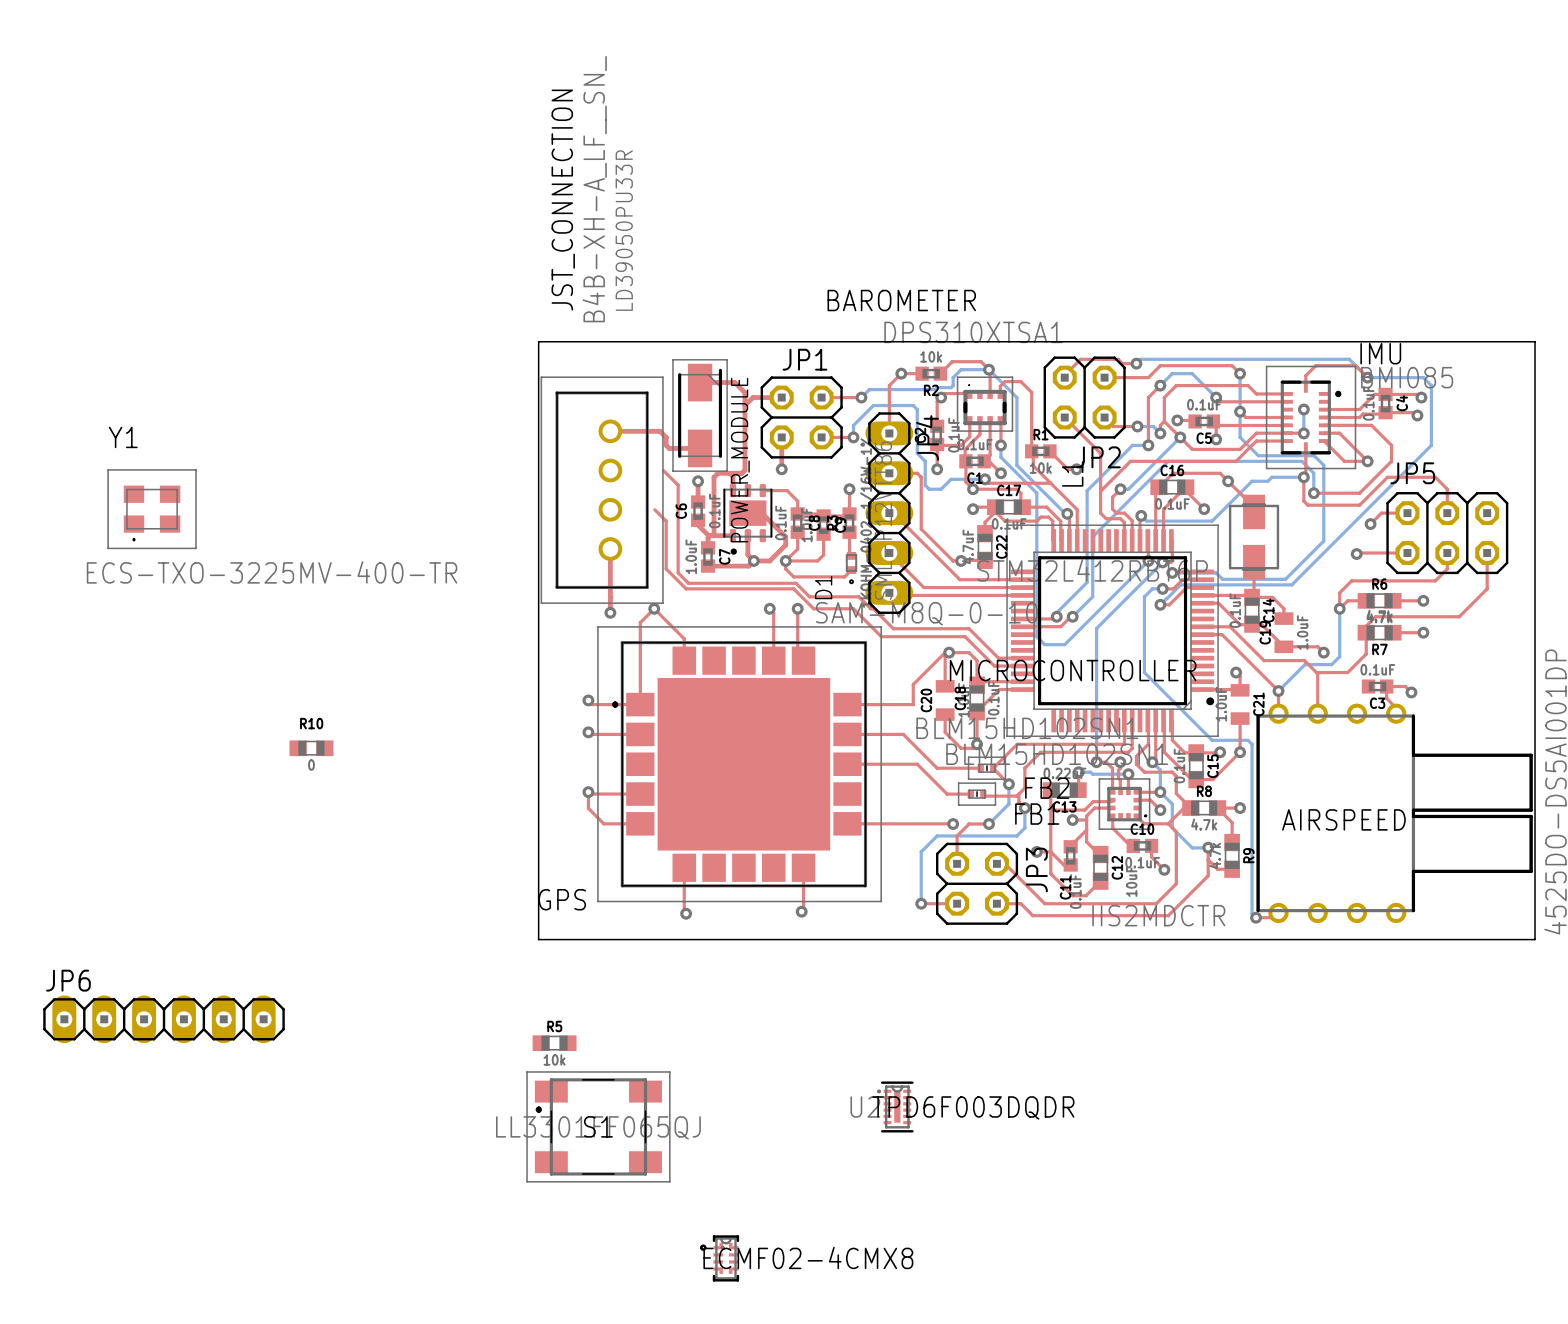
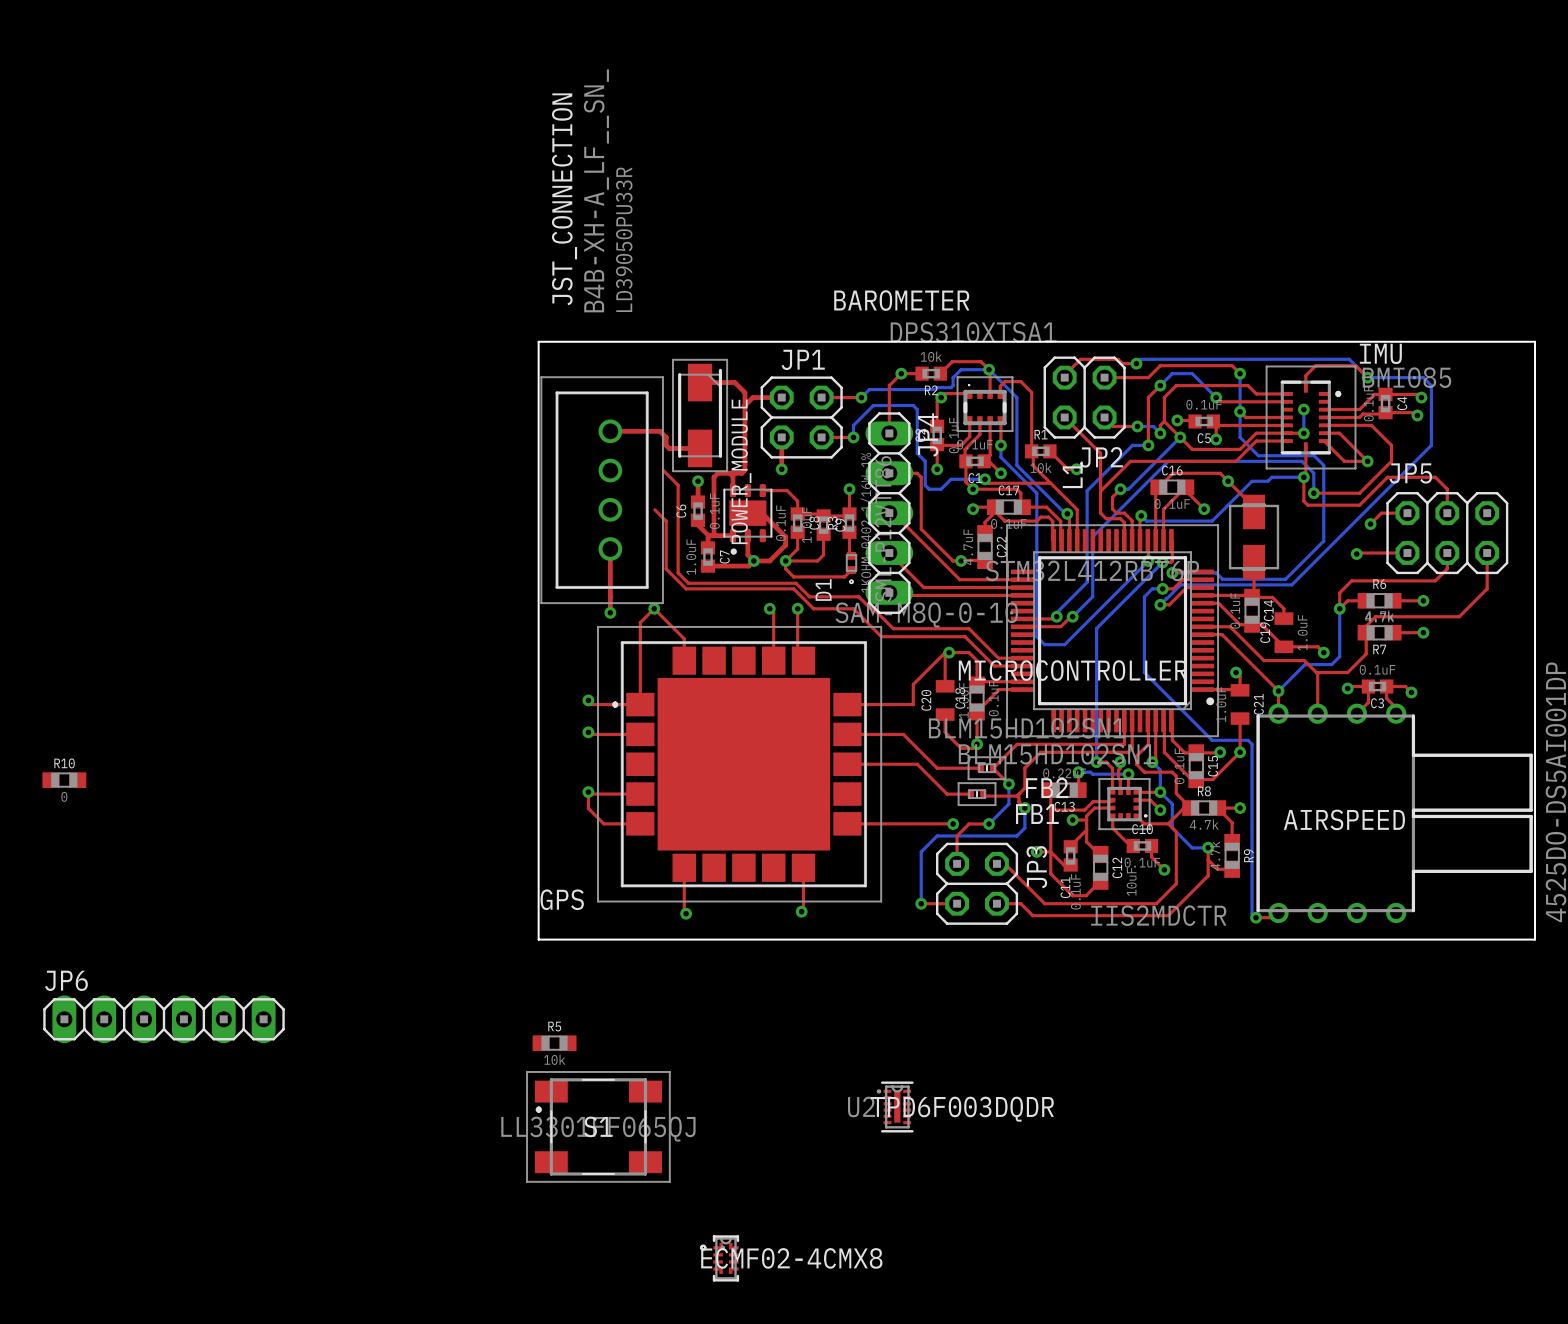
Y1: ECS-TXO-3225MV-400-TR (152, 509) -> none
top track: none -> (1347, 688) (1349, 686) (1368, 686) (1368, 702) (1357, 713)
via: none -> (1347, 688)
R10 name position: R10 (311, 723) -> R10 (64, 763)
R10 position: (311, 748) -> (64, 780)

